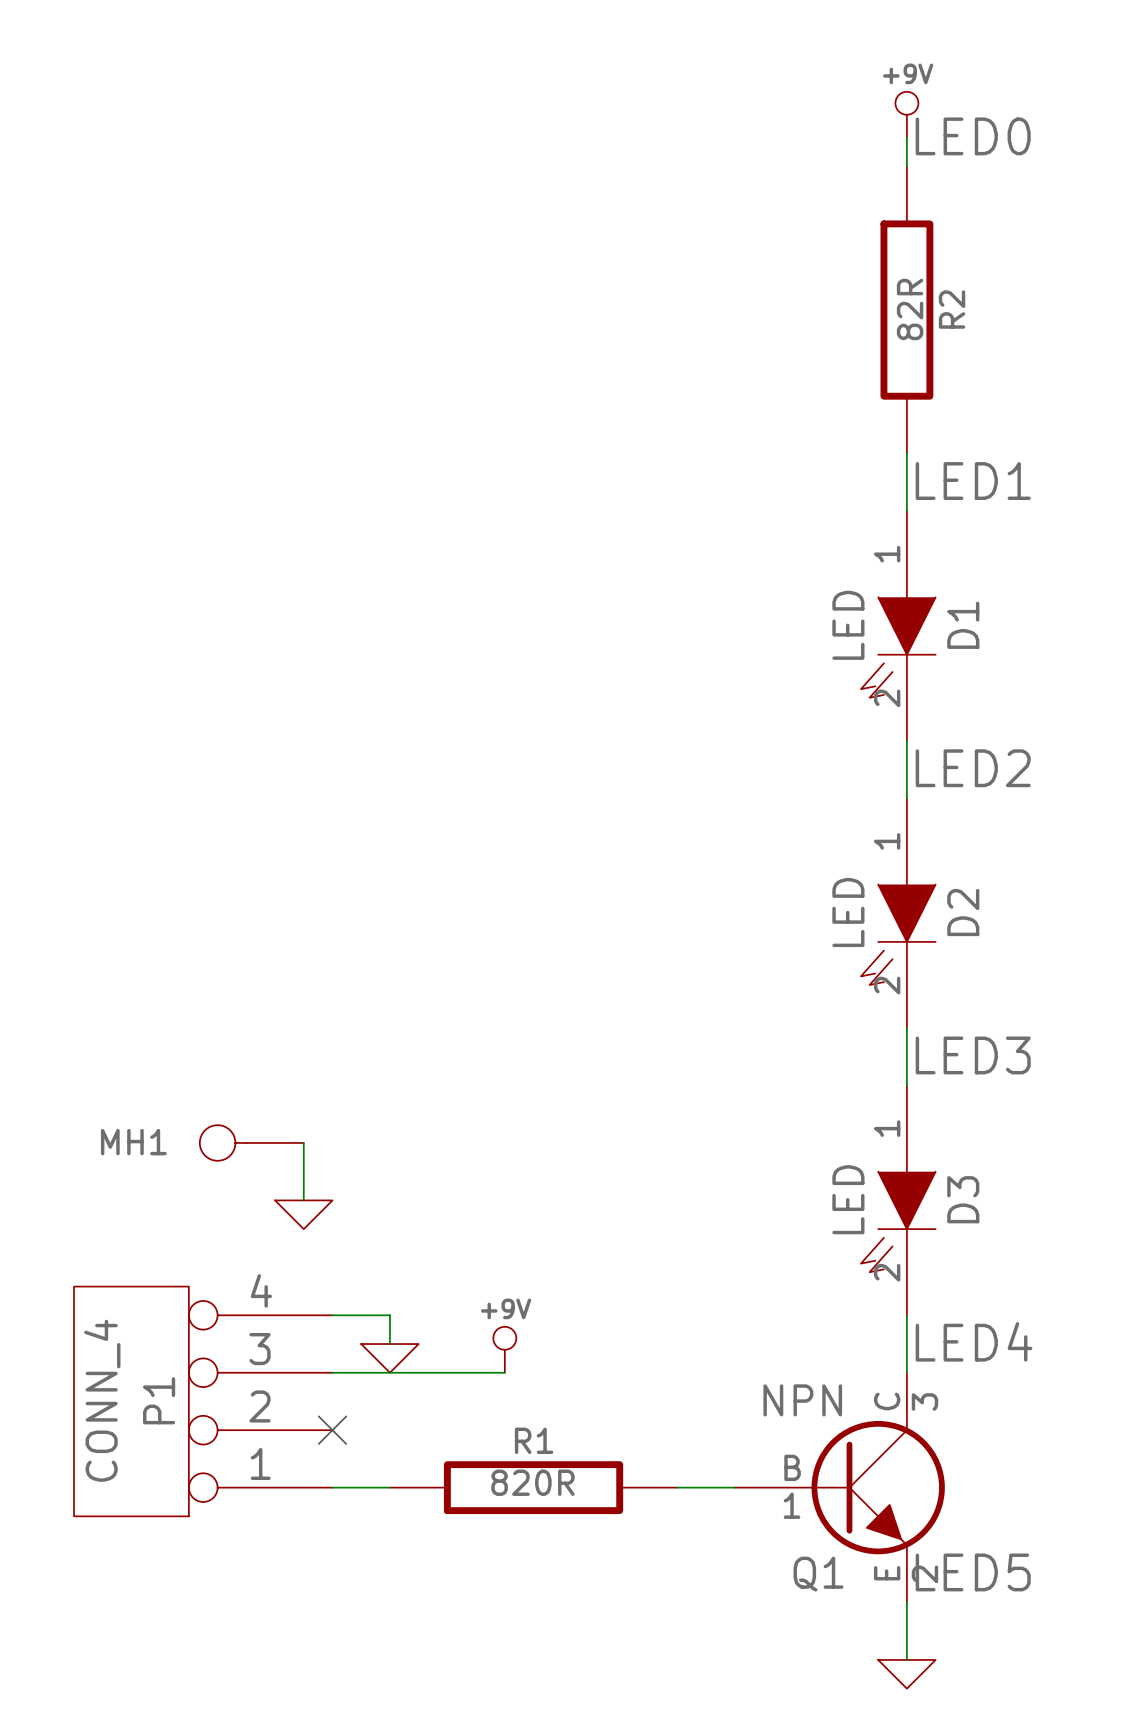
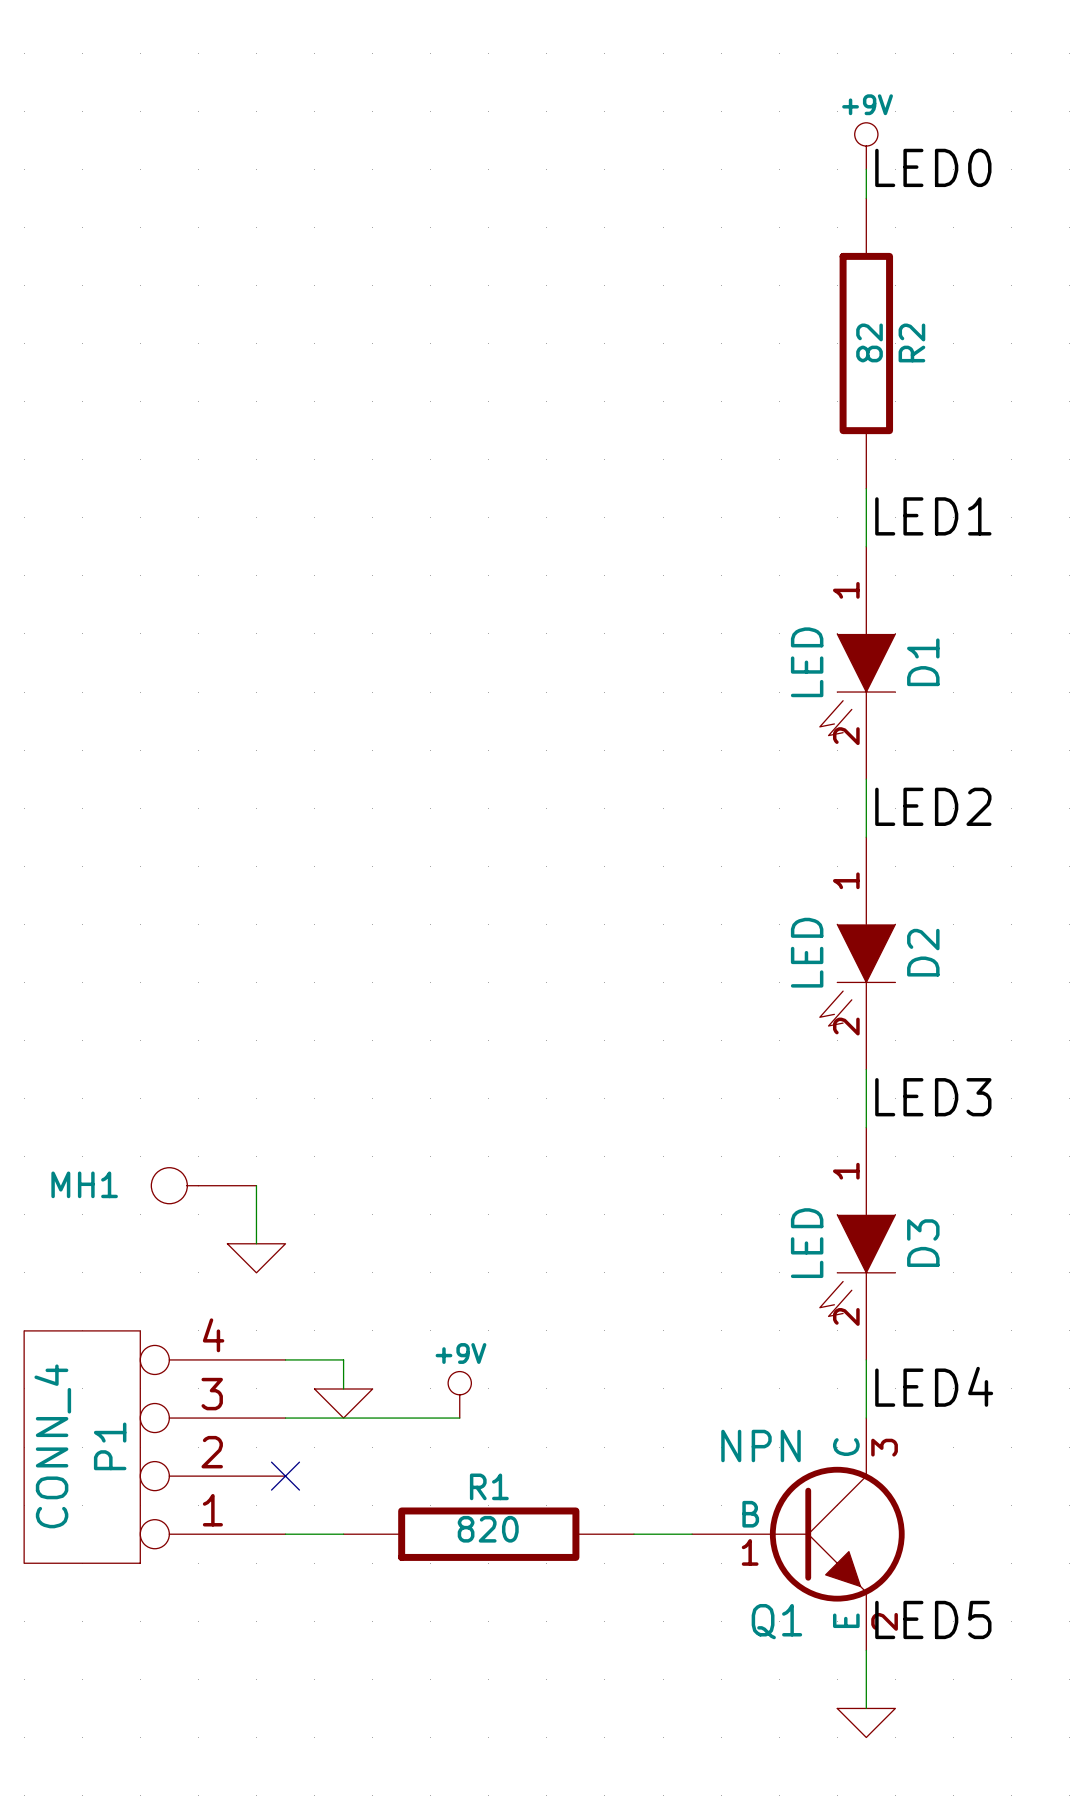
R2 value: 82R (910, 309) -> 82 (869, 342)
R1 value: 820R (532, 1482) -> 820 (488, 1529)

